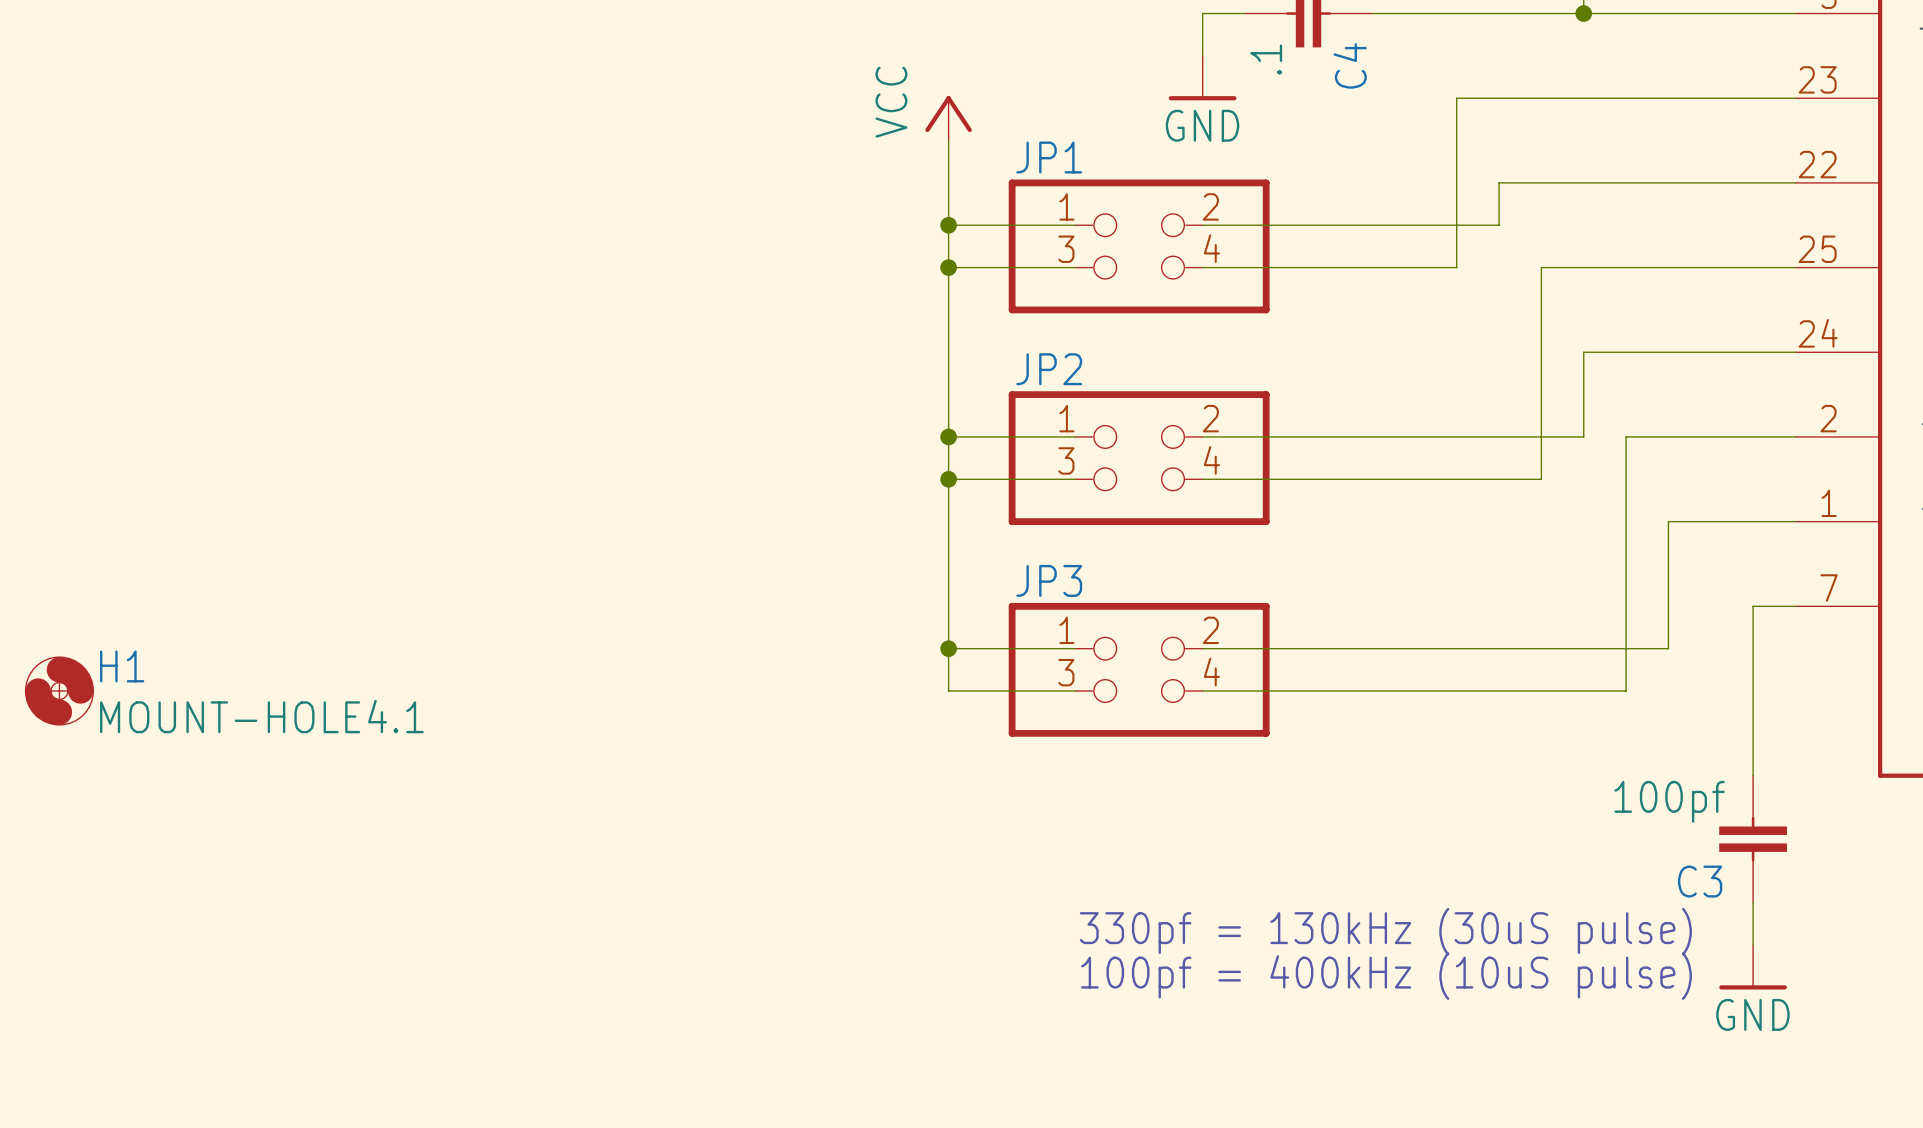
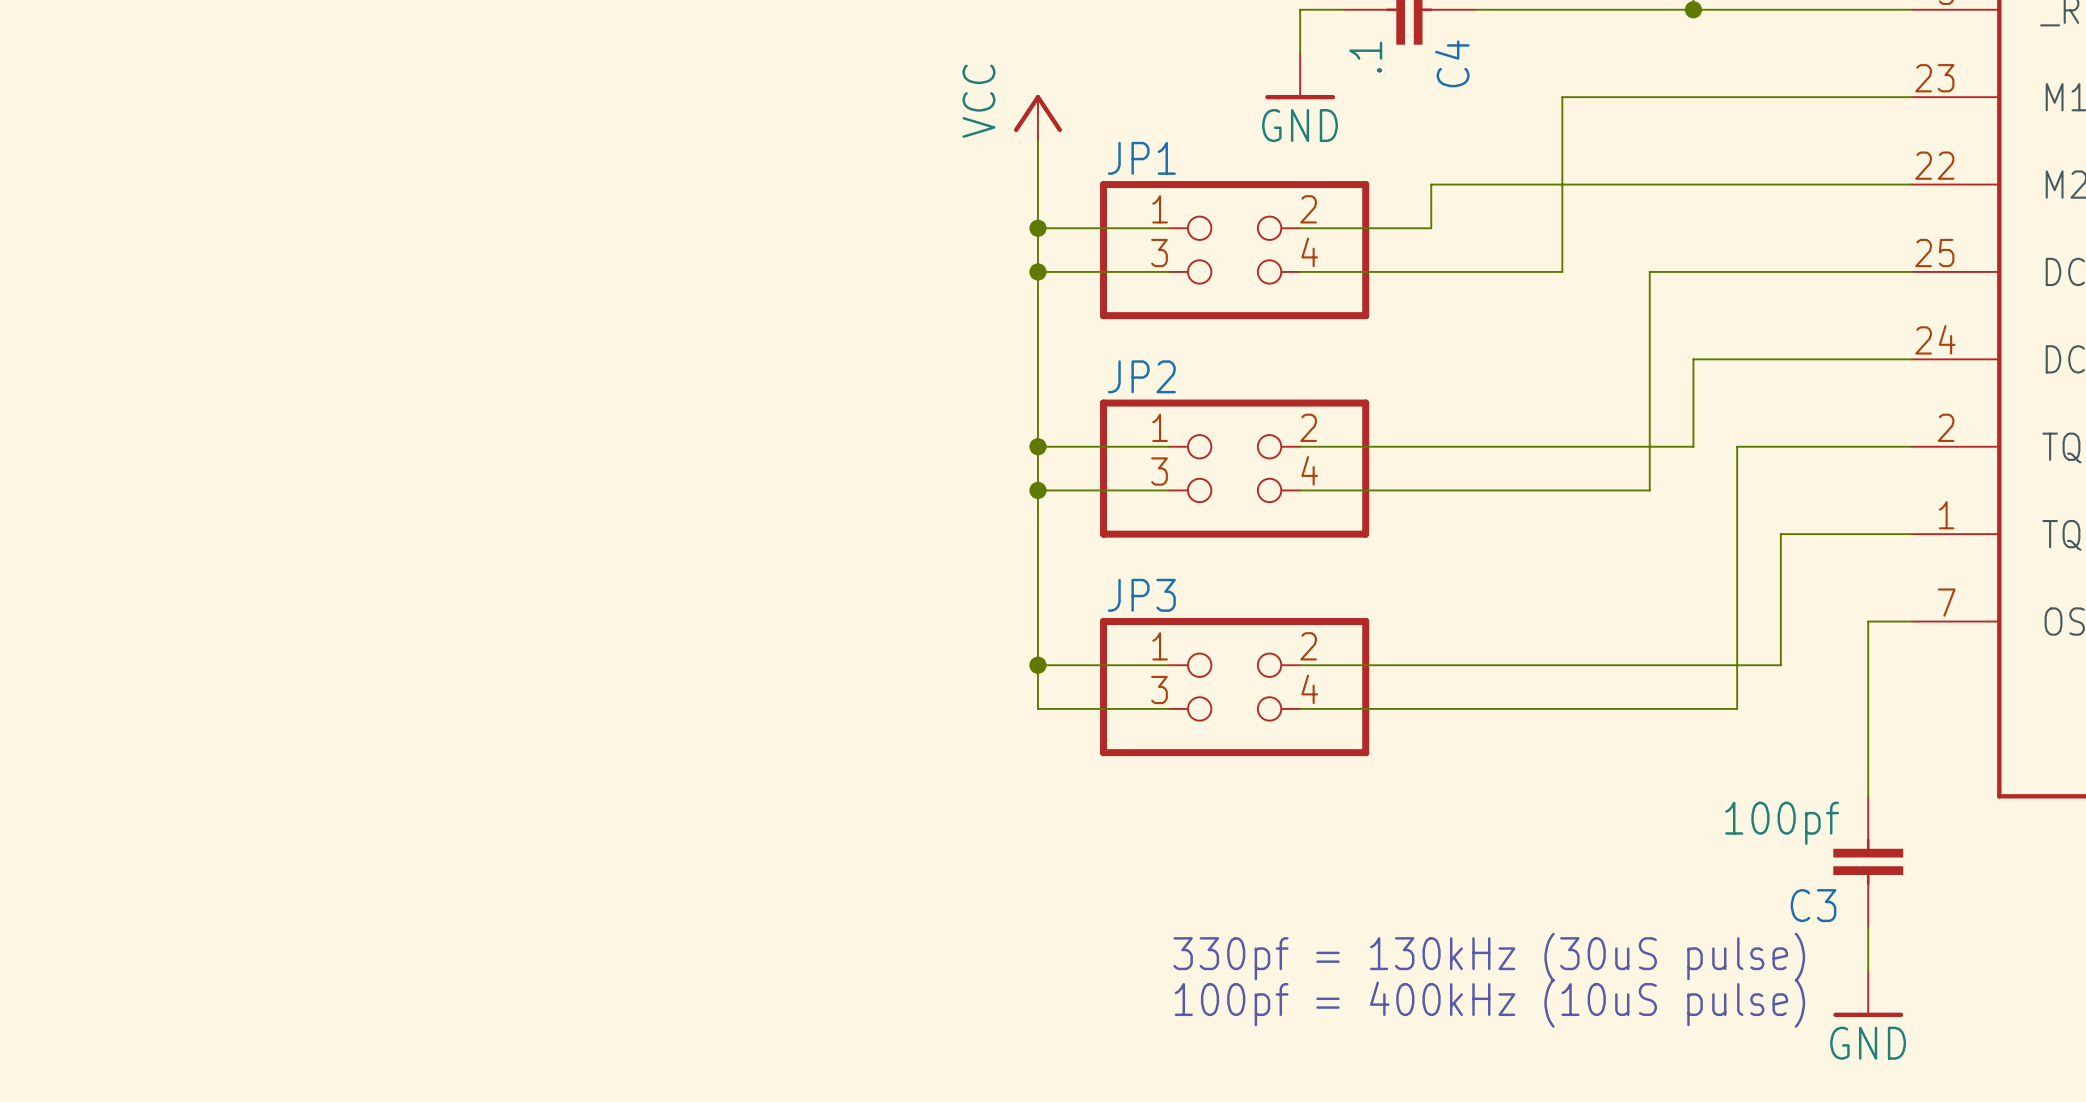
wire: (1499, 182) (1499, 225) (1329, 225) -> (1606, 184) (1431, 184) (1431, 228)
H1: MOUNT-HOLE4.1 (59, 691) -> none

